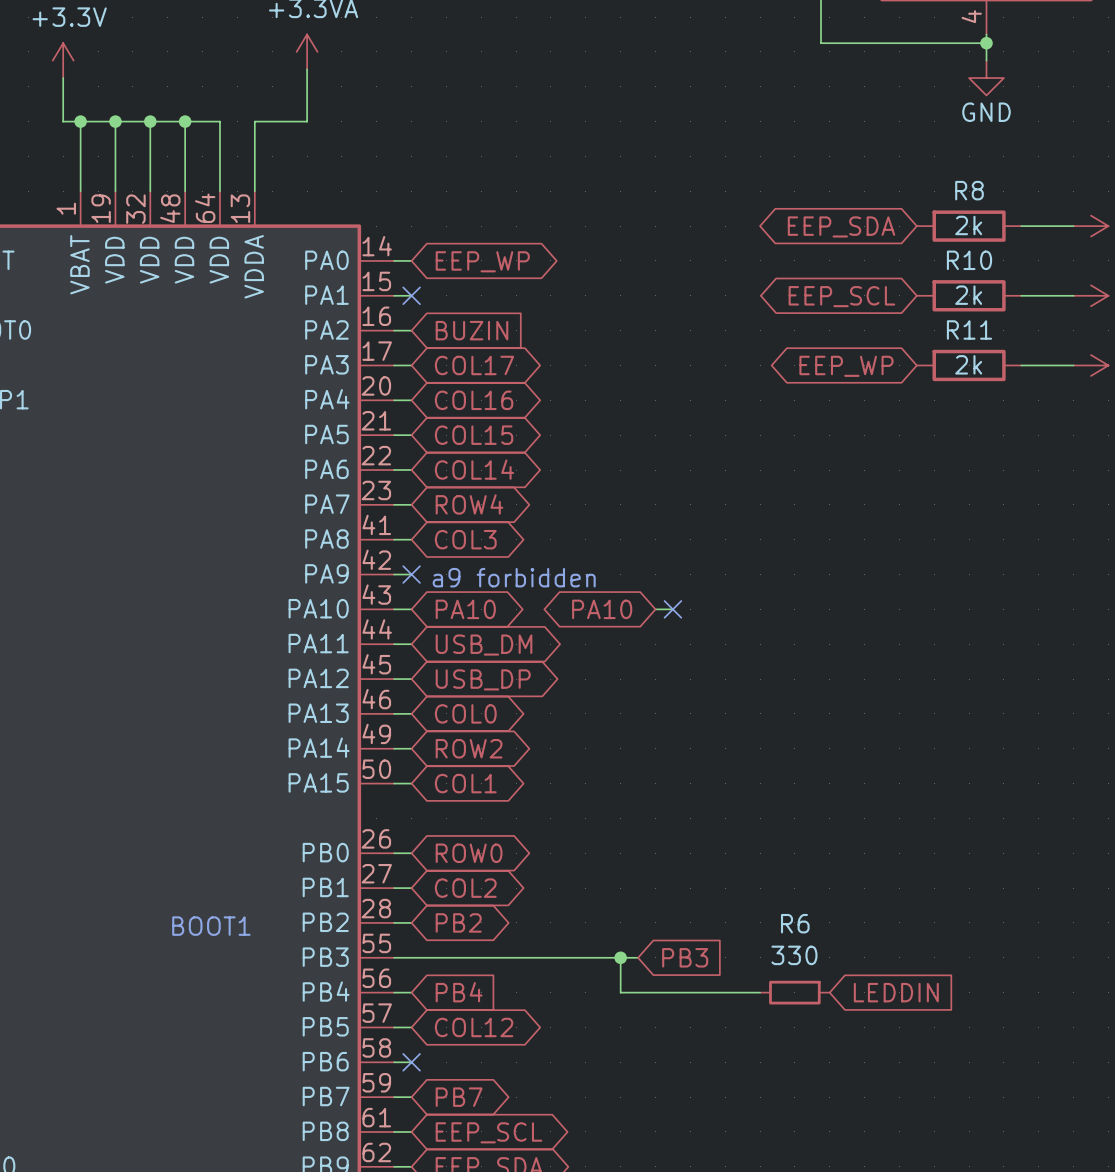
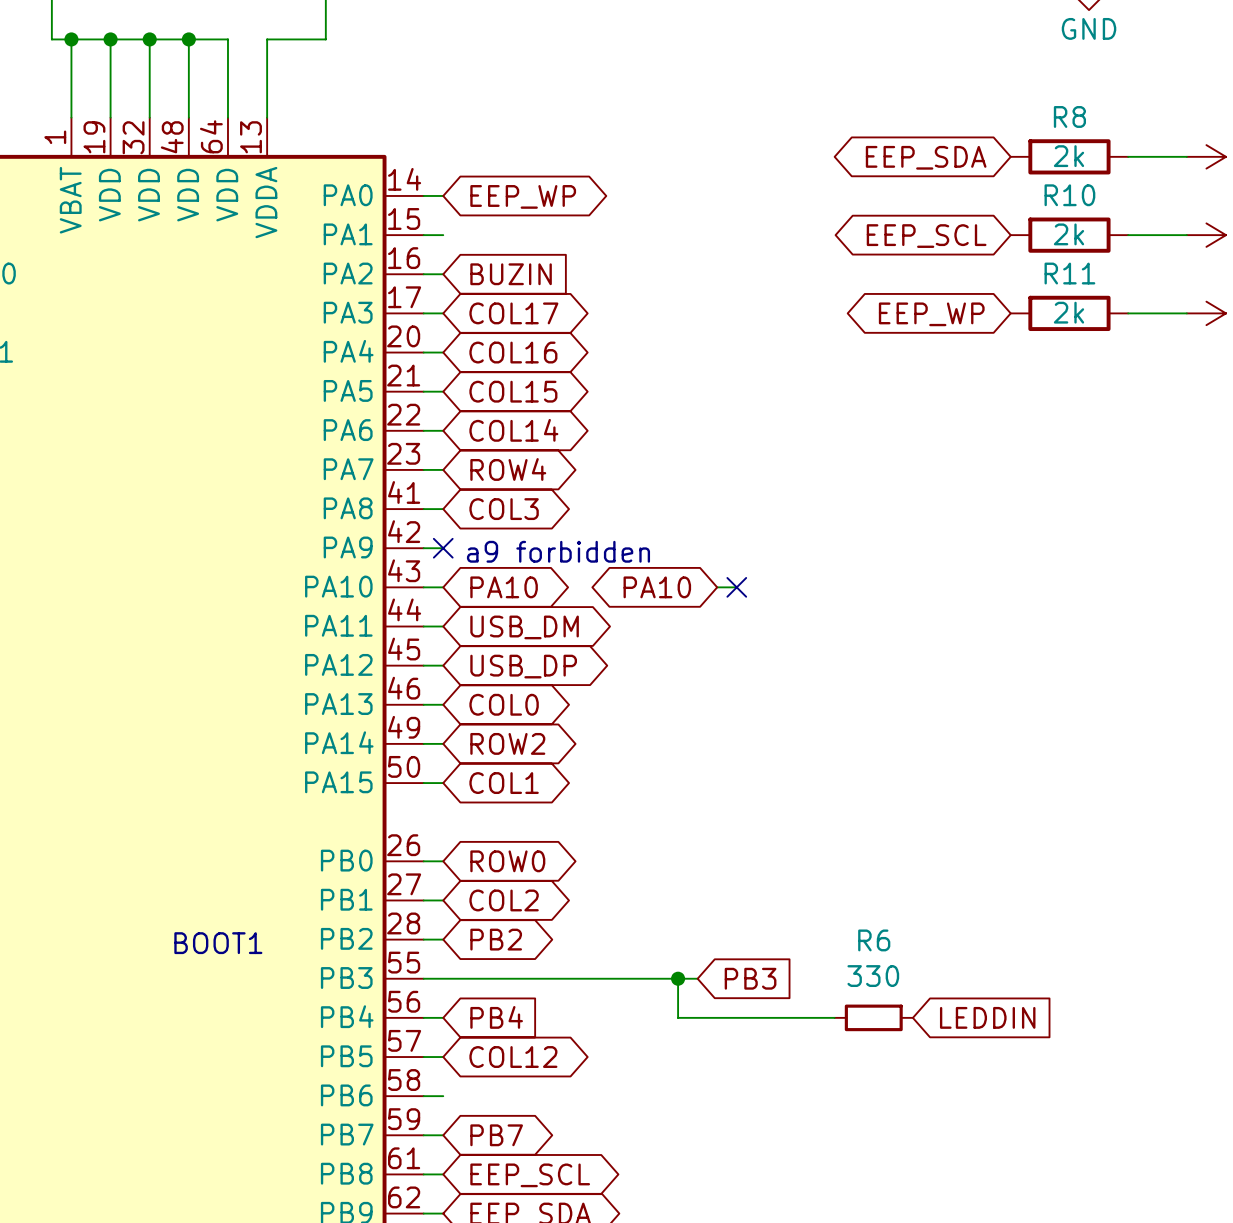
no-connect mark: (411, 295) -> none
no-connect mark: (411, 1062) -> none

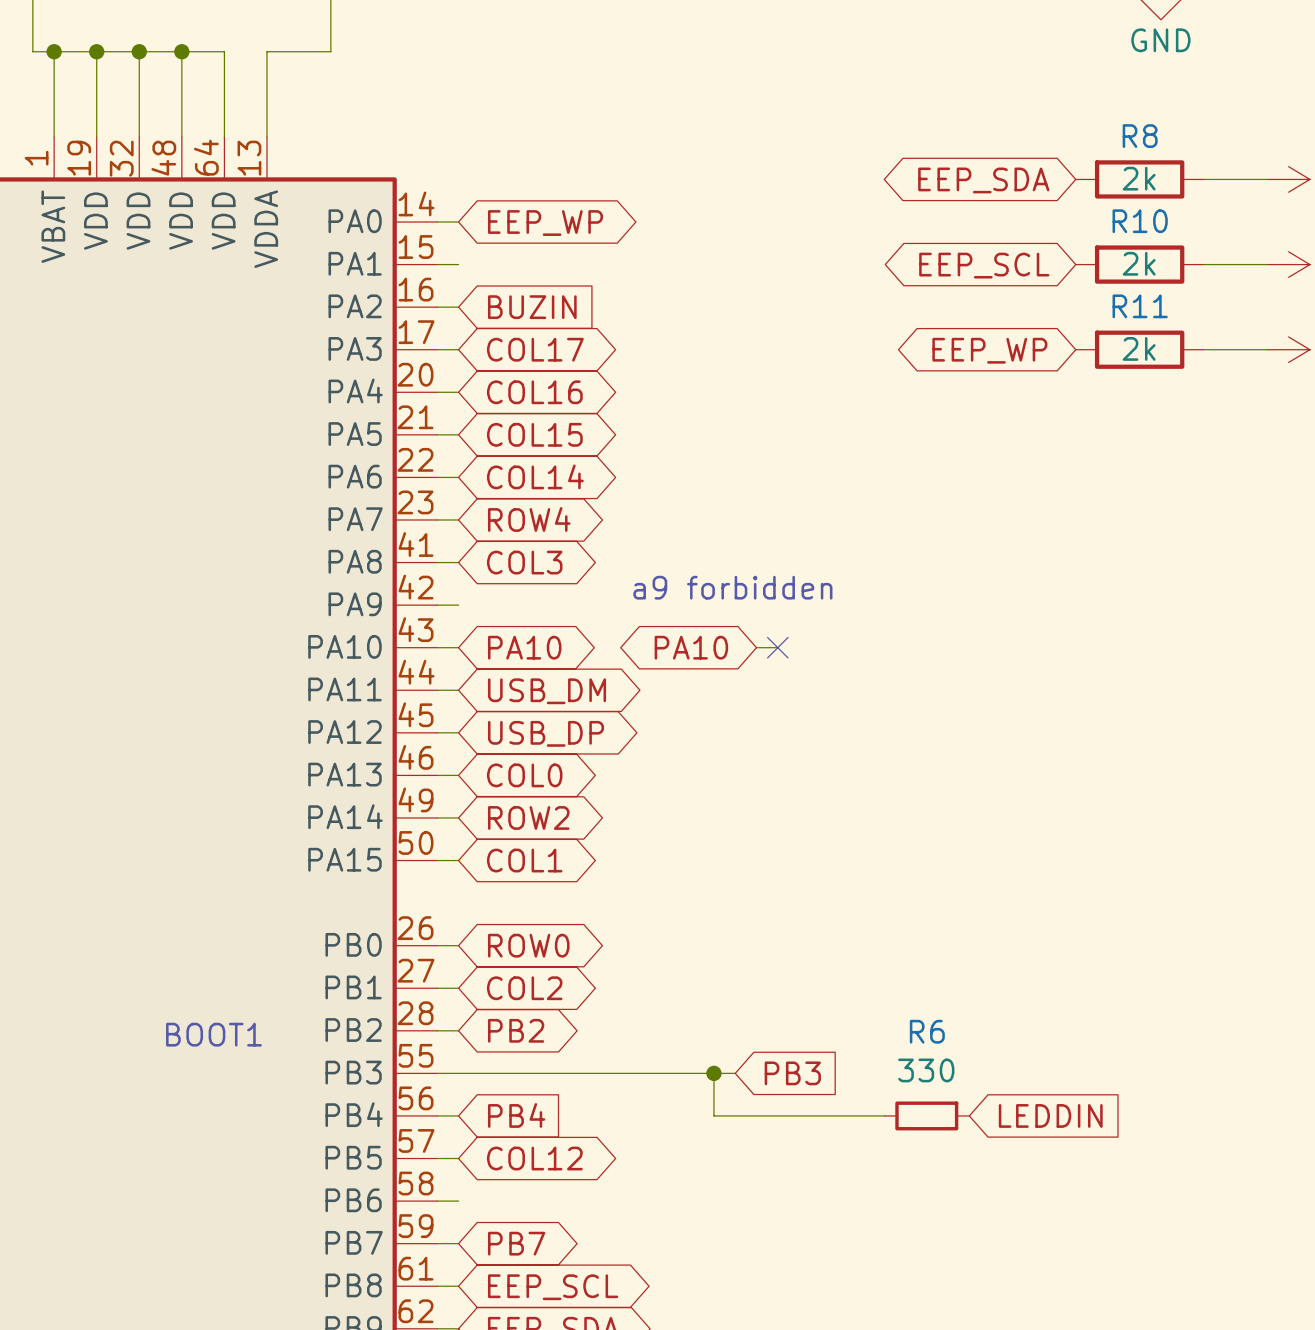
no-connect mark: (443, 548) -> none
text position: a9 forbidden (558, 551) -> a9 forbidden (732, 587)

